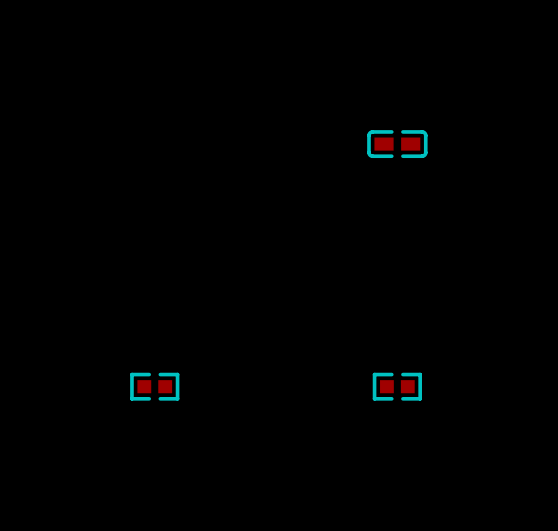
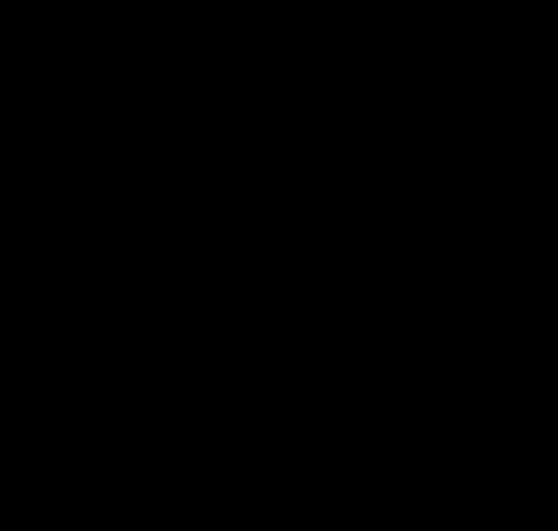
part: (397, 144) -> none
part: (154, 386) -> none
part: (397, 386) -> none

